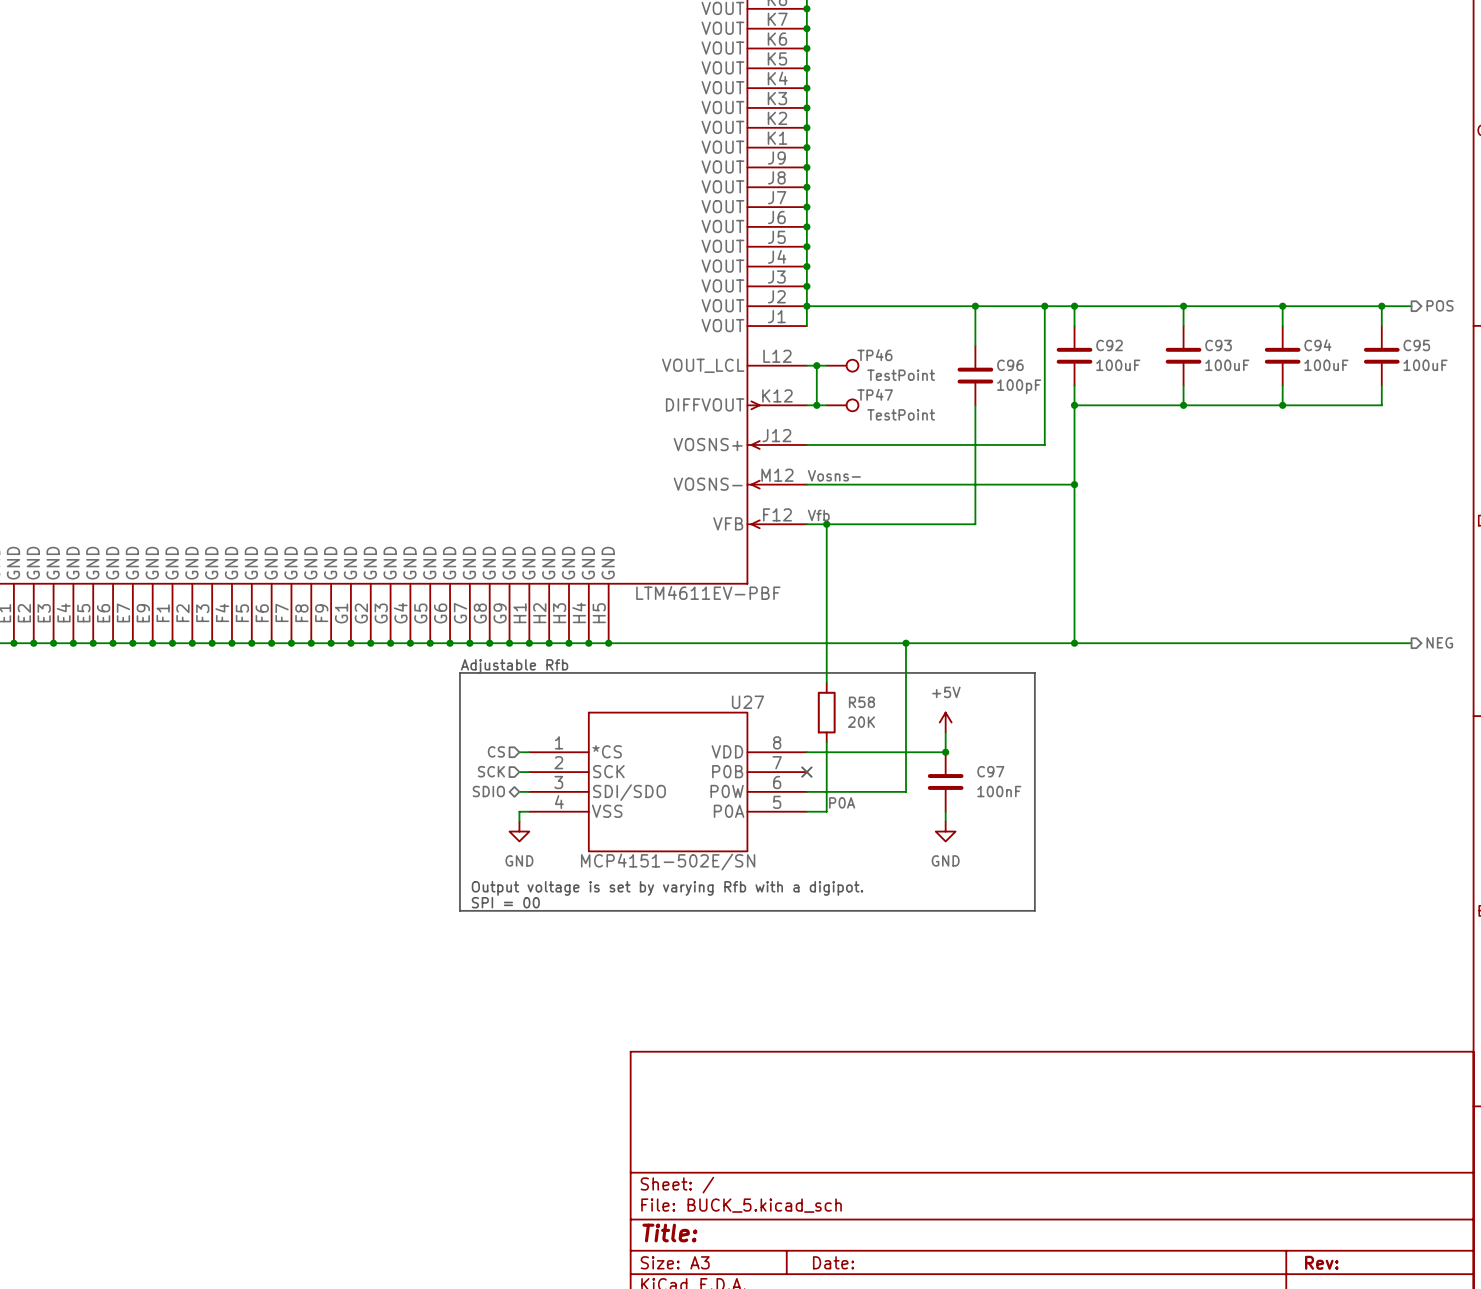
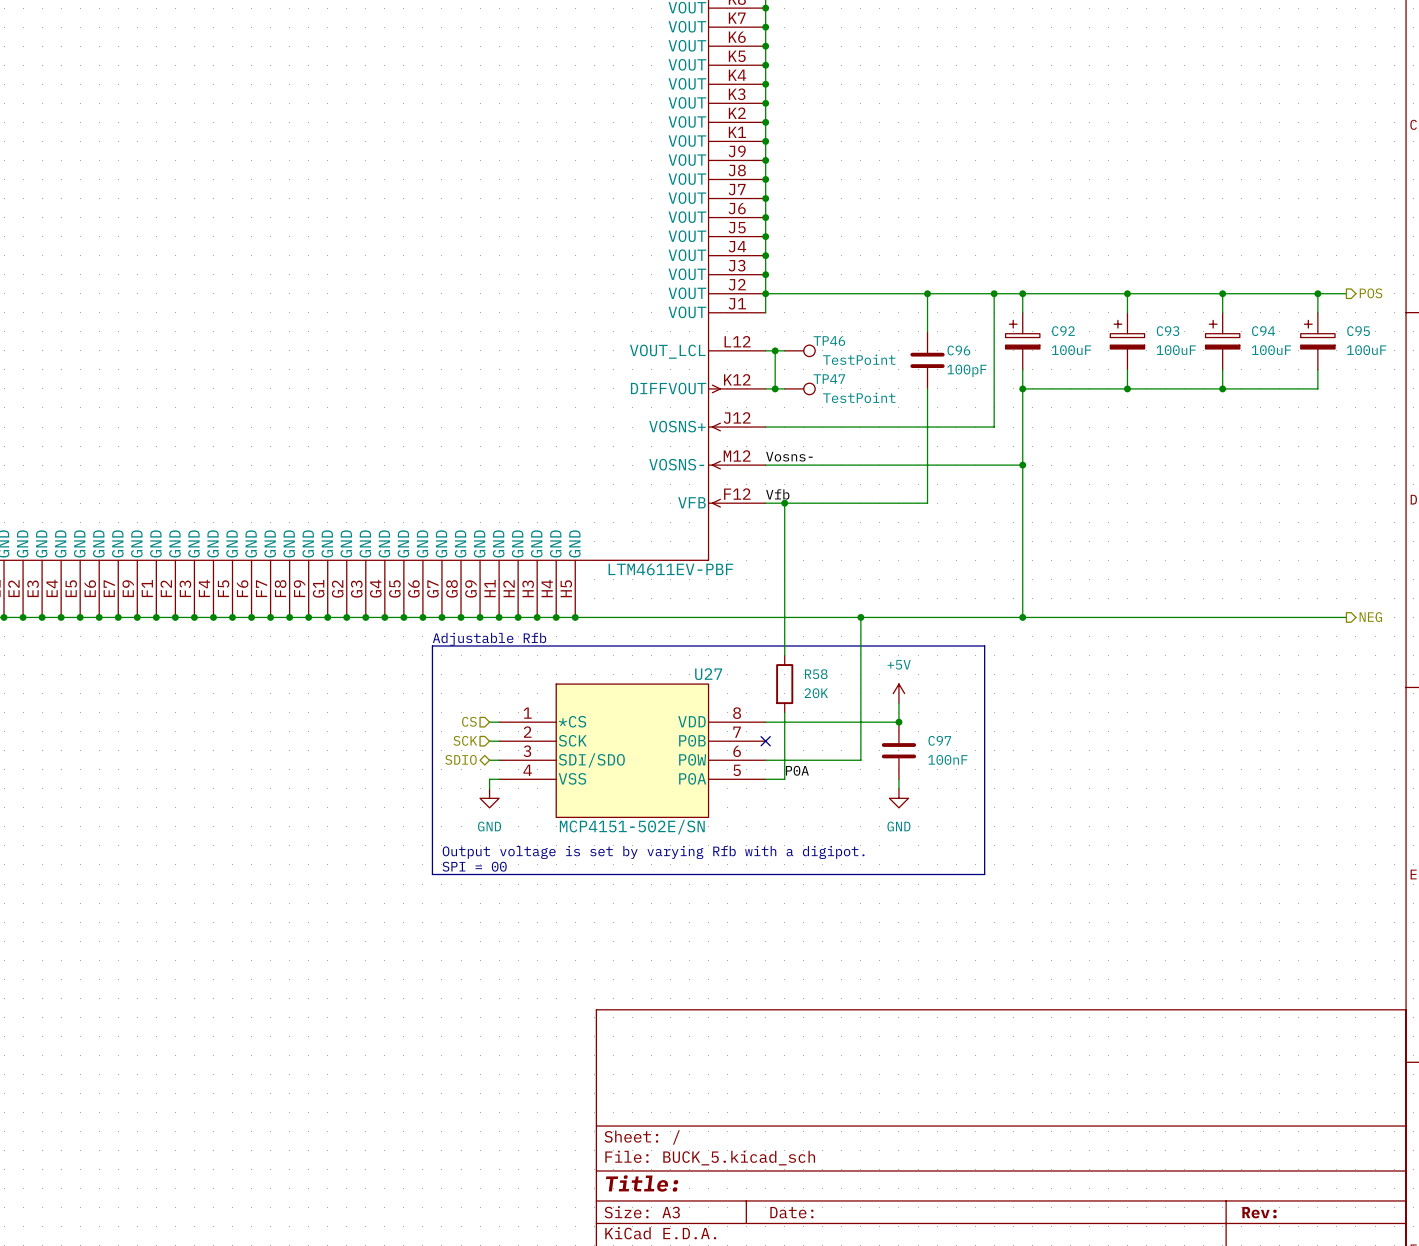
C92 symbol: [1056, 326, 1093, 386] -> [1005, 312, 1040, 370]
C93 symbol: [1165, 326, 1202, 386] -> [1110, 312, 1145, 370]
C94 symbol: [1264, 326, 1301, 386] -> [1205, 312, 1240, 370]
C95 symbol: [1363, 326, 1400, 386] -> [1300, 312, 1336, 370]

